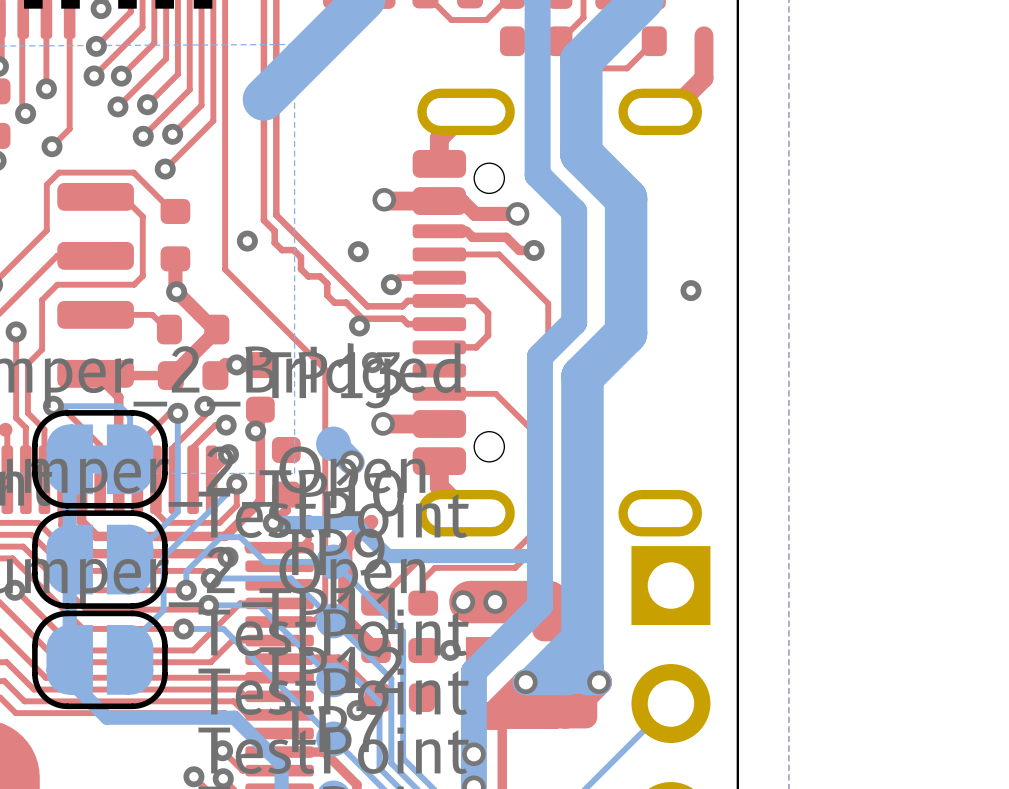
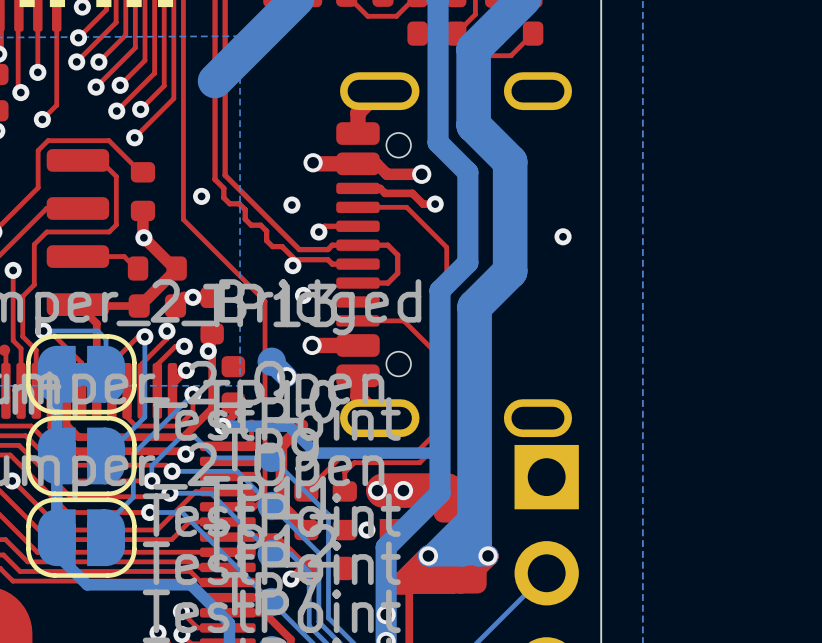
top track: (703, 35) (703, 78) (670, 111) (660, 111) -> none

